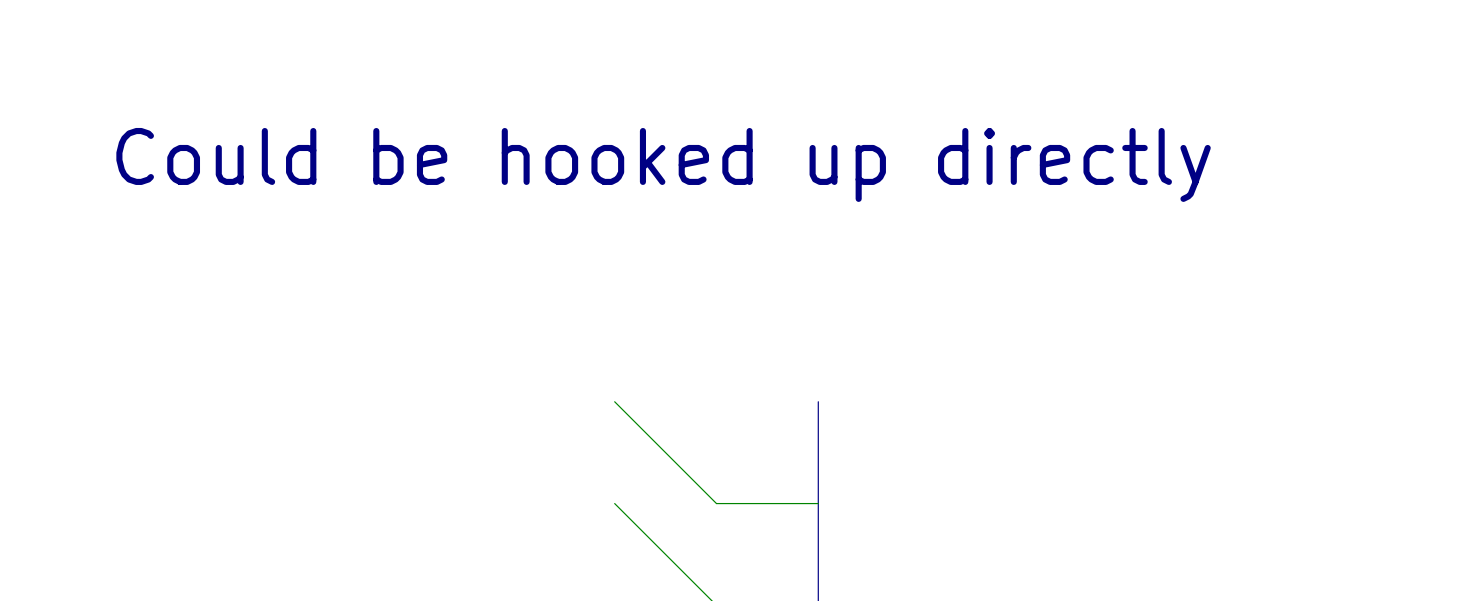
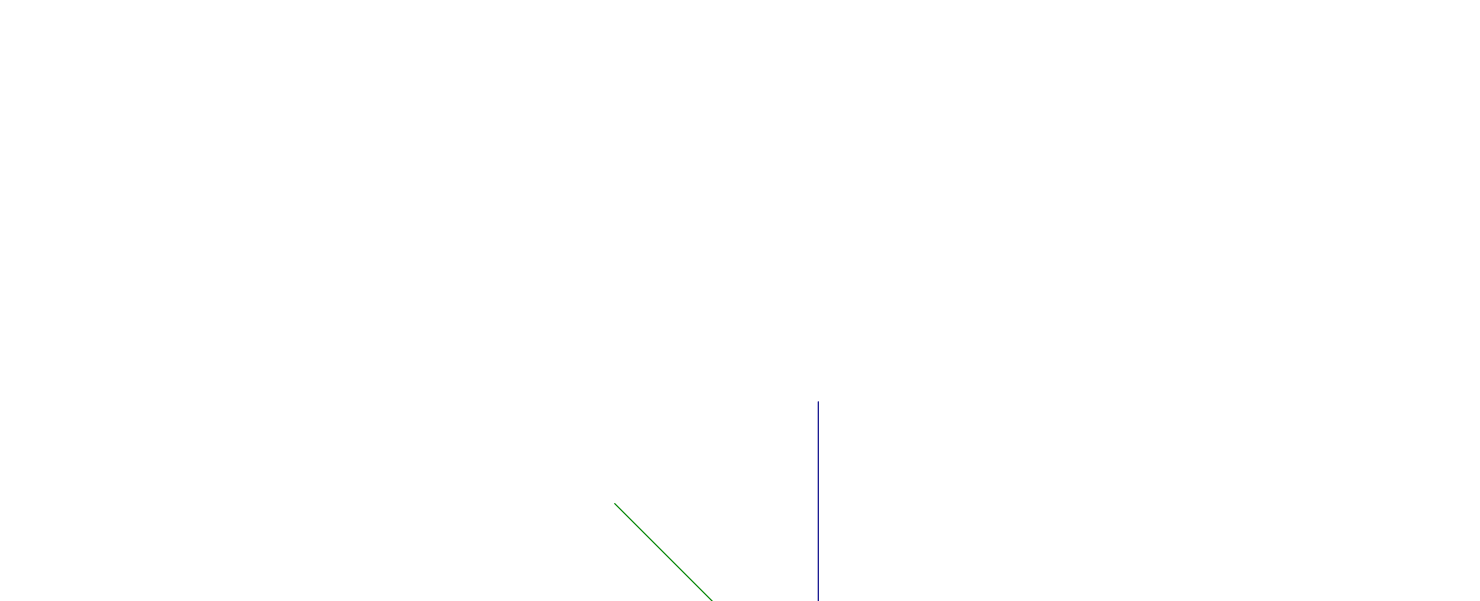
text: Could be hooked up directly (663, 164) -> none
wire: (614, 401) (716, 503) (818, 503) -> none

